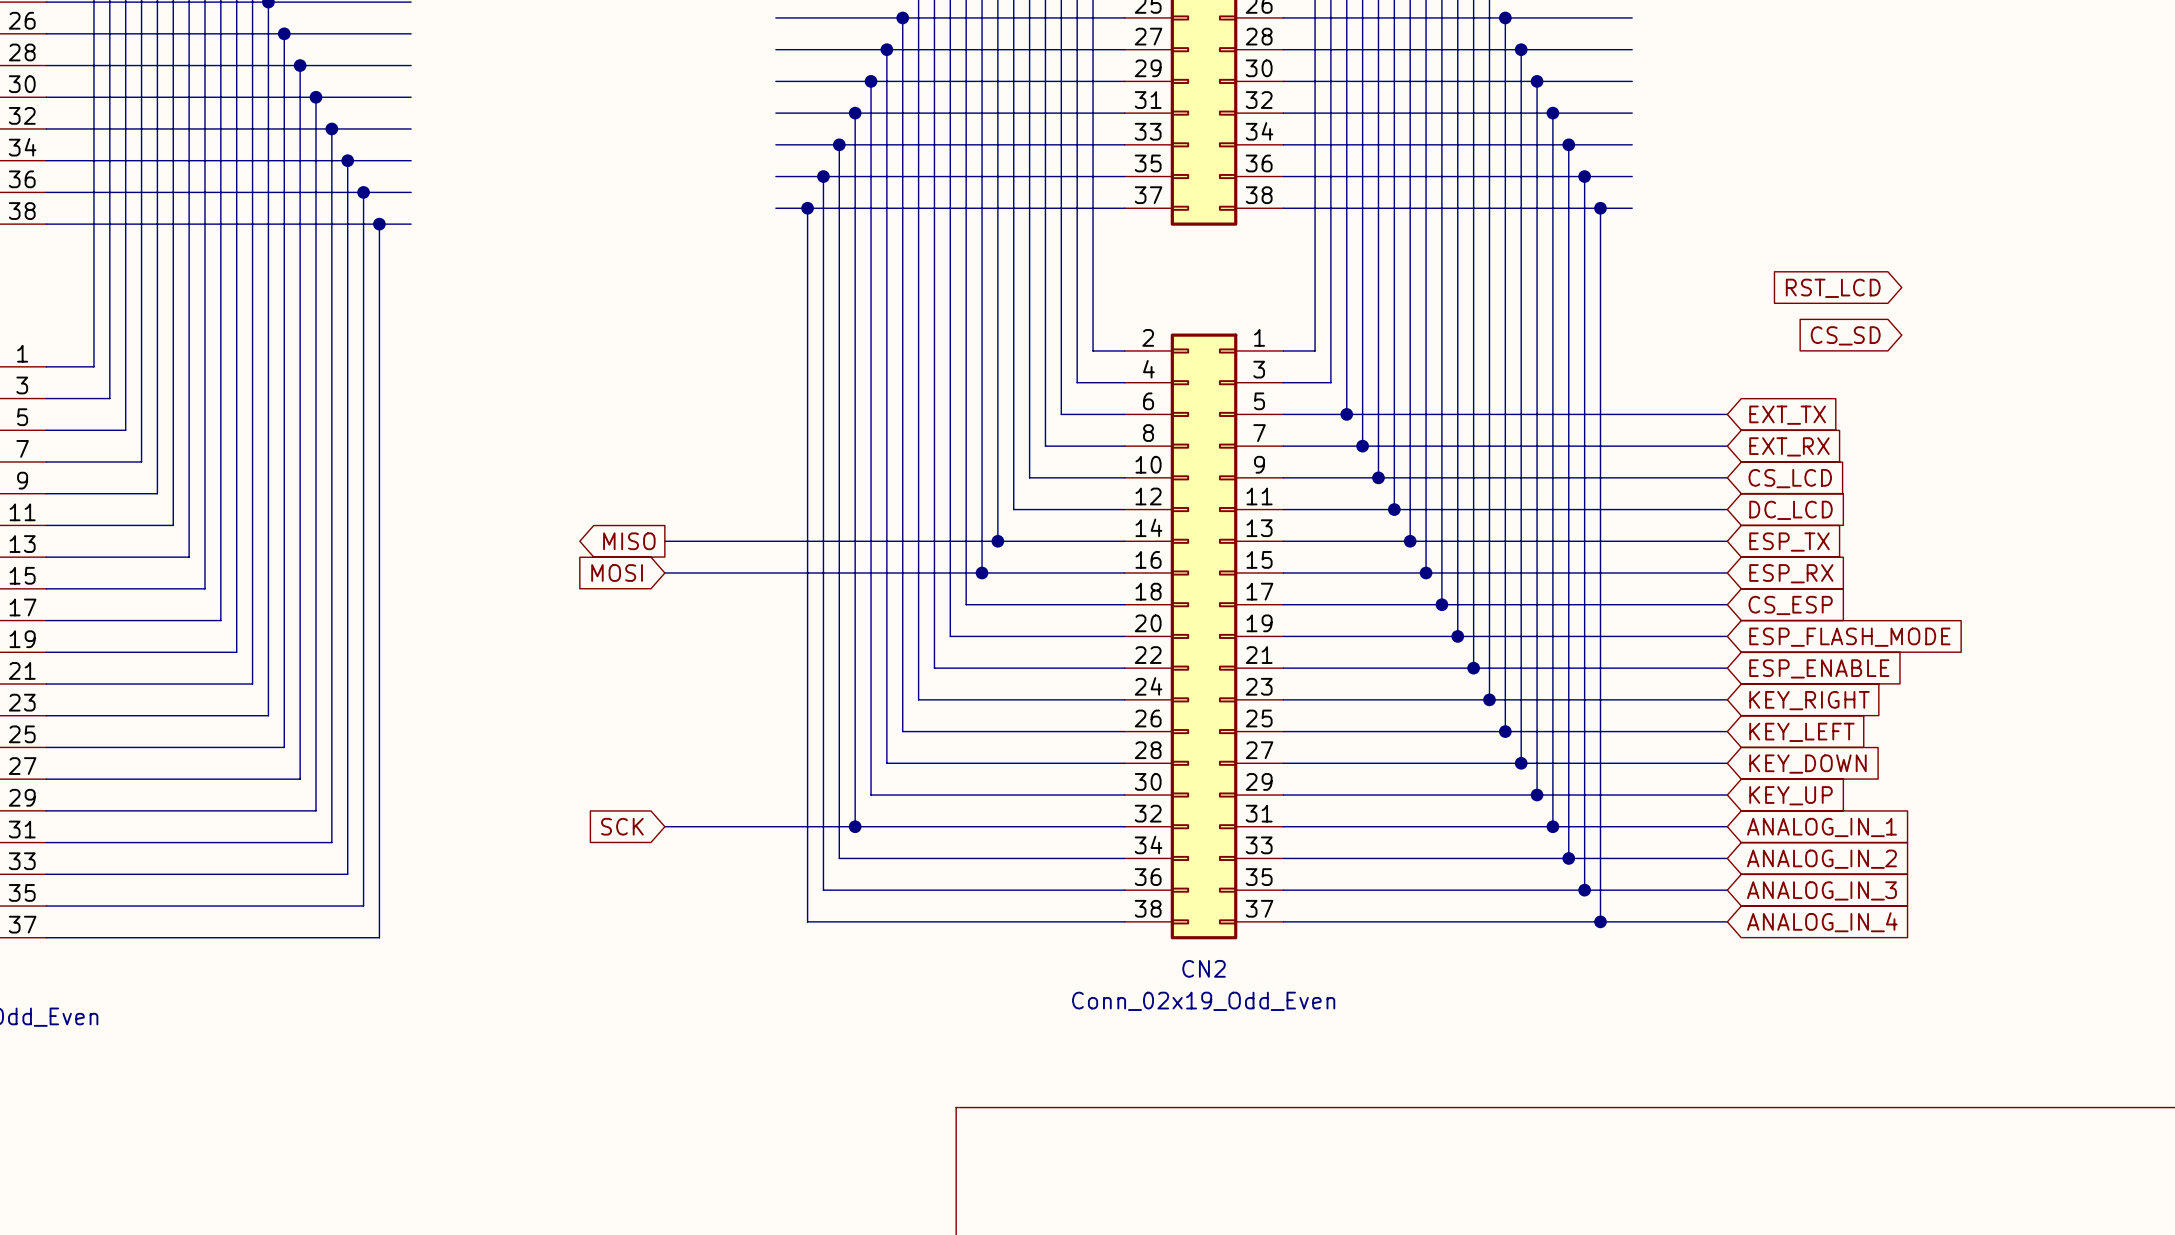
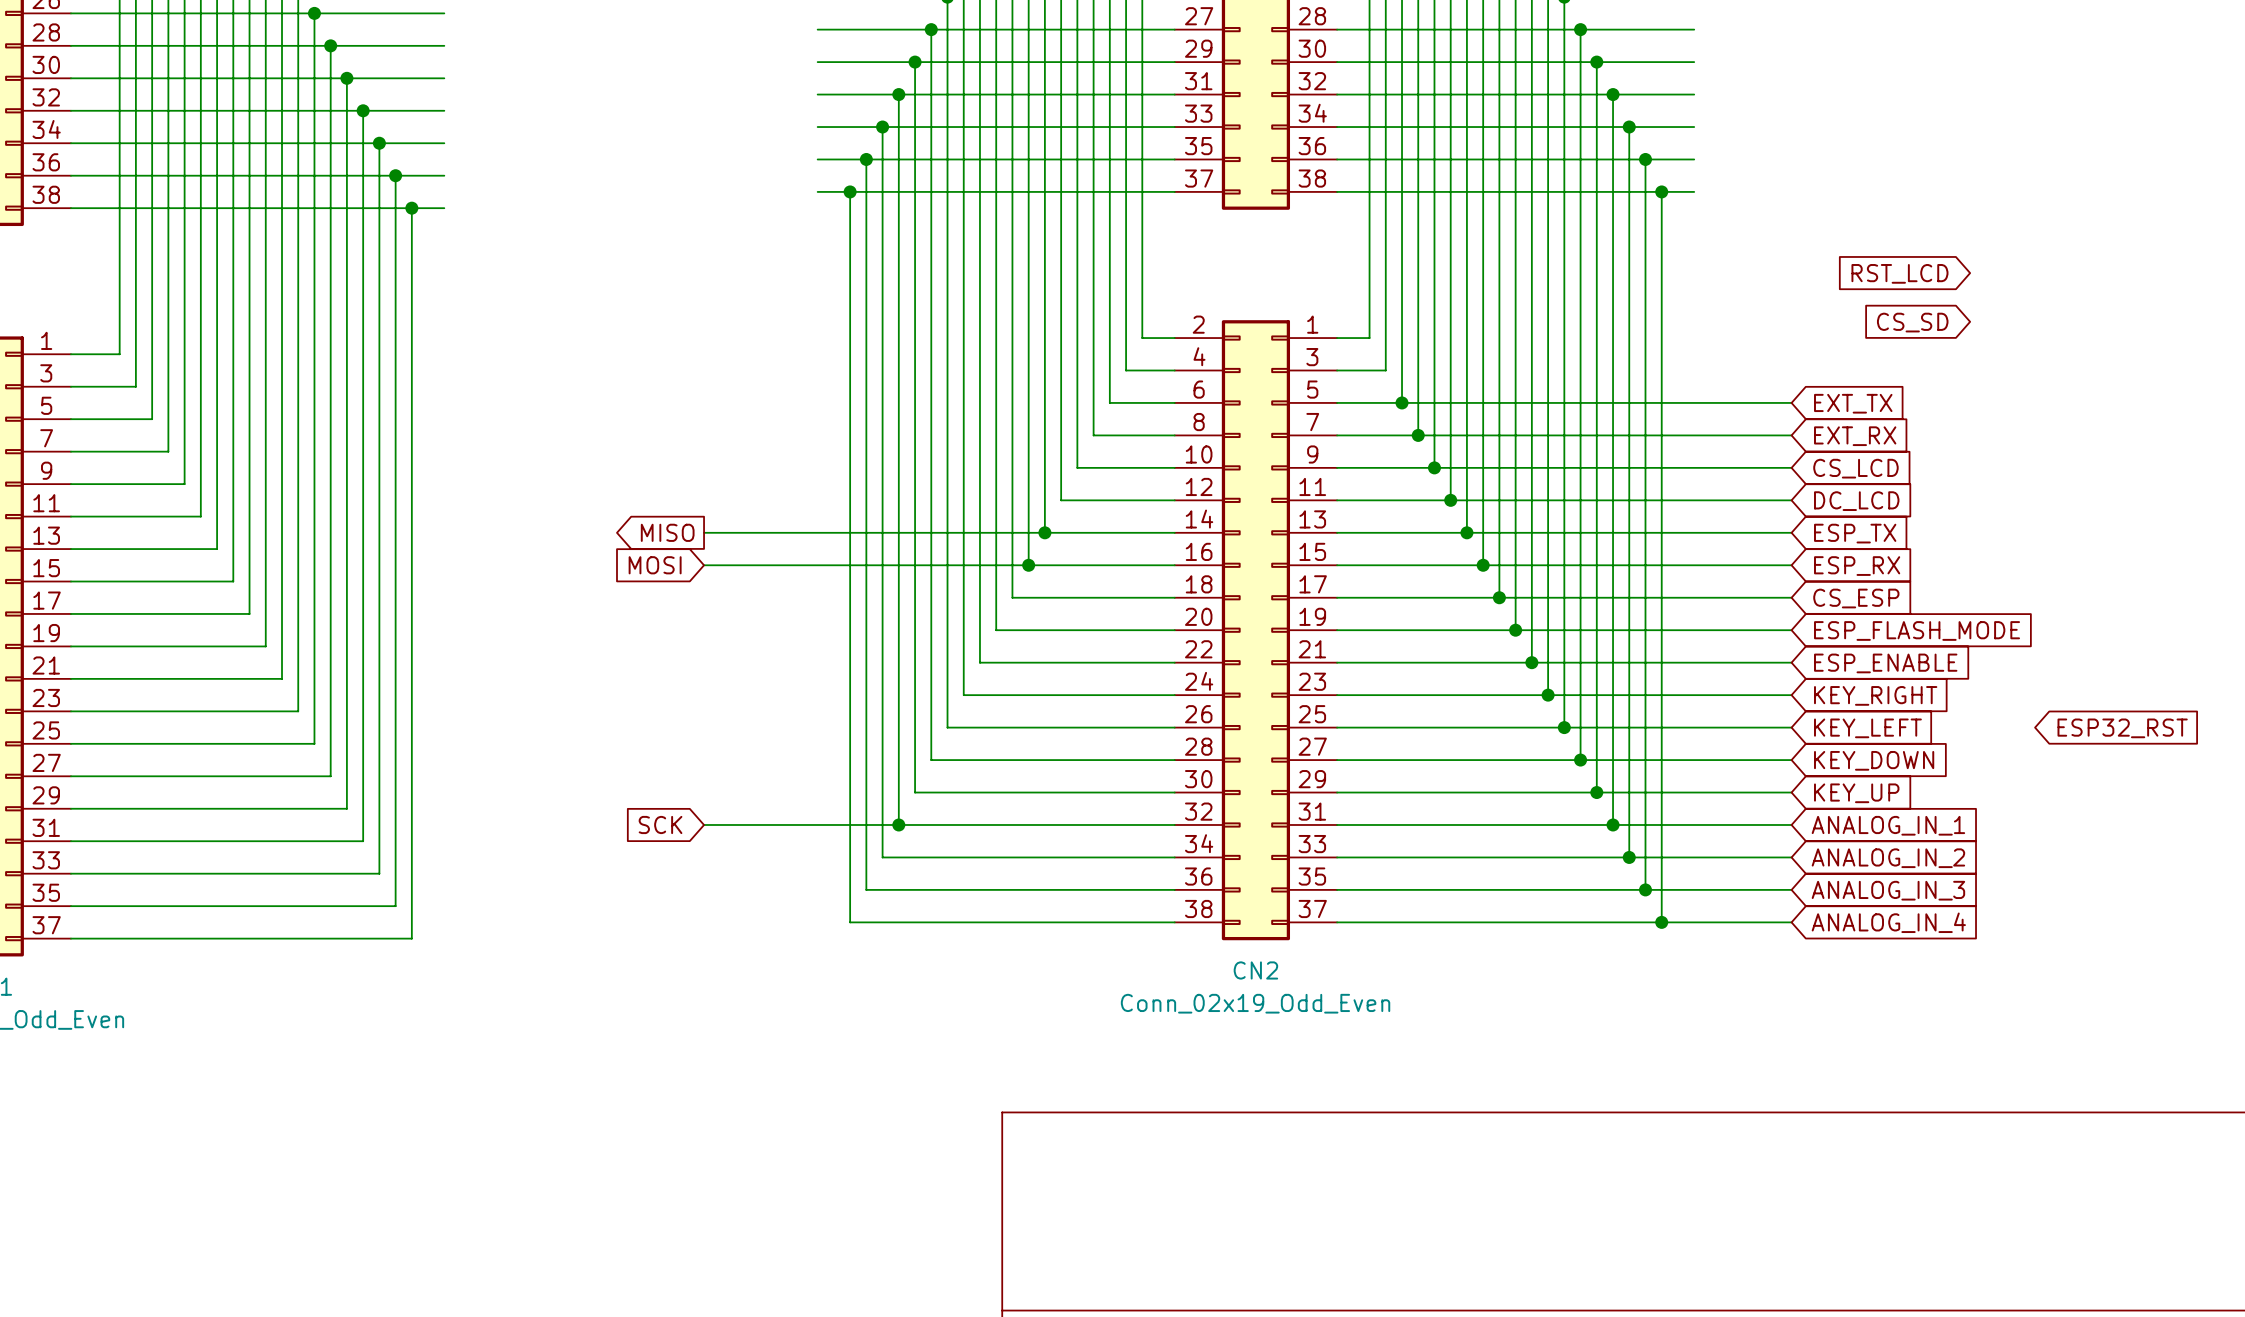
global label: none -> ESP32_RST (2122, 728)

